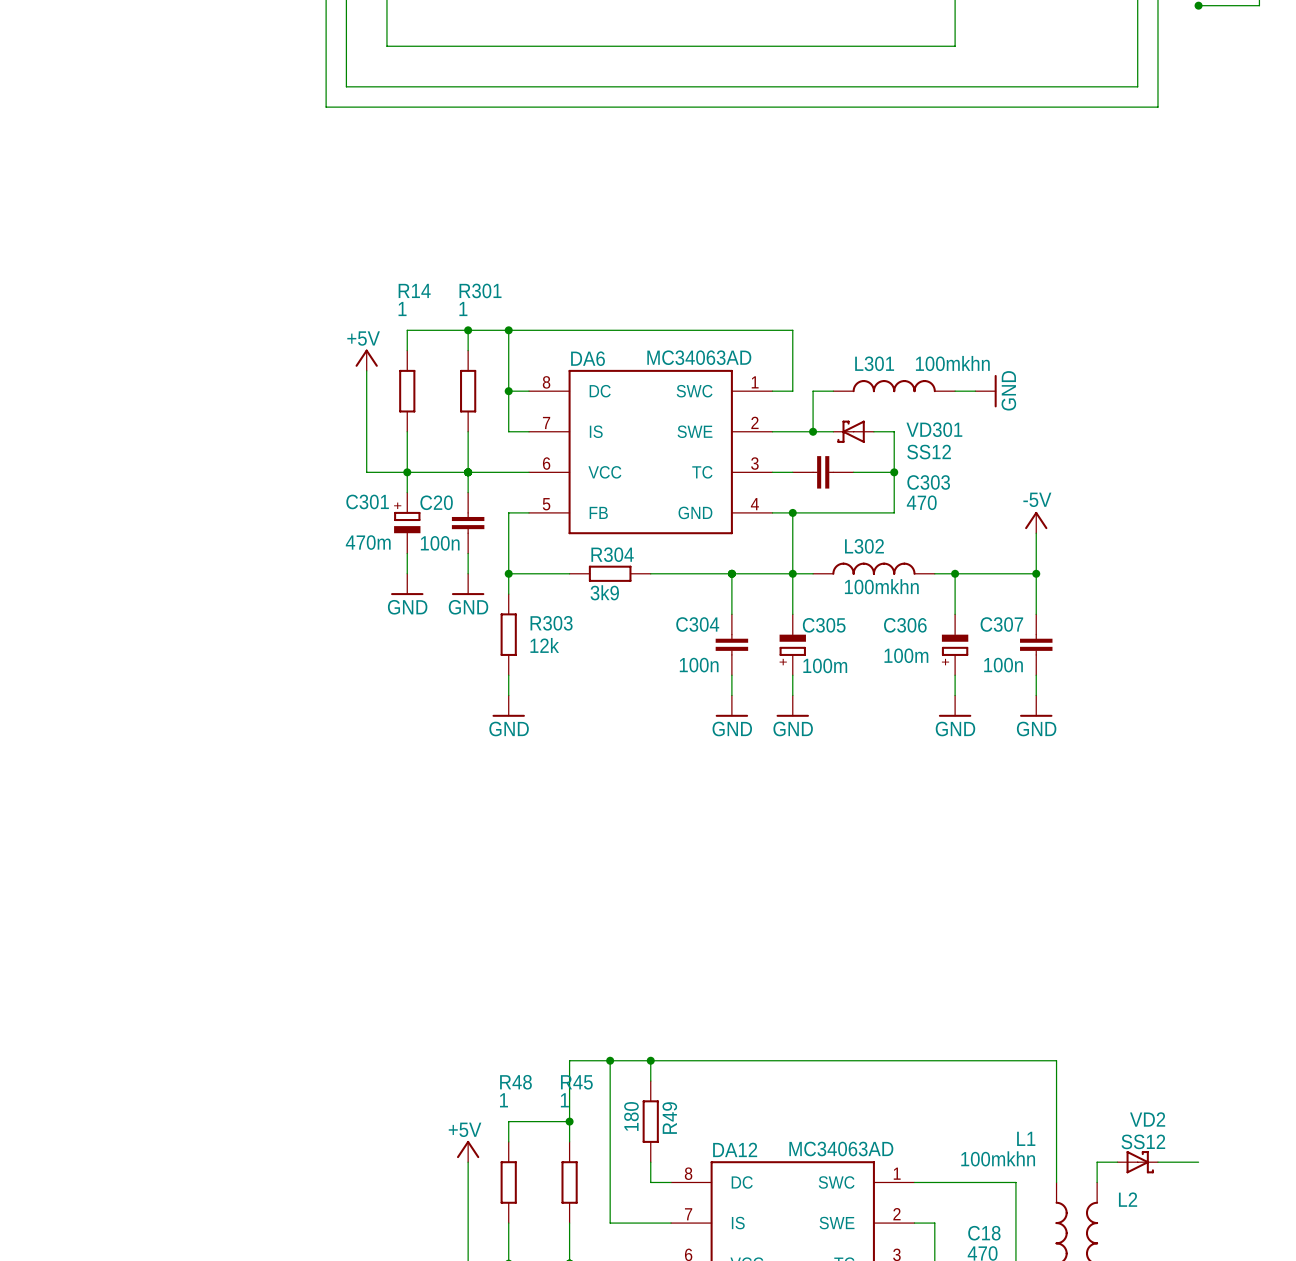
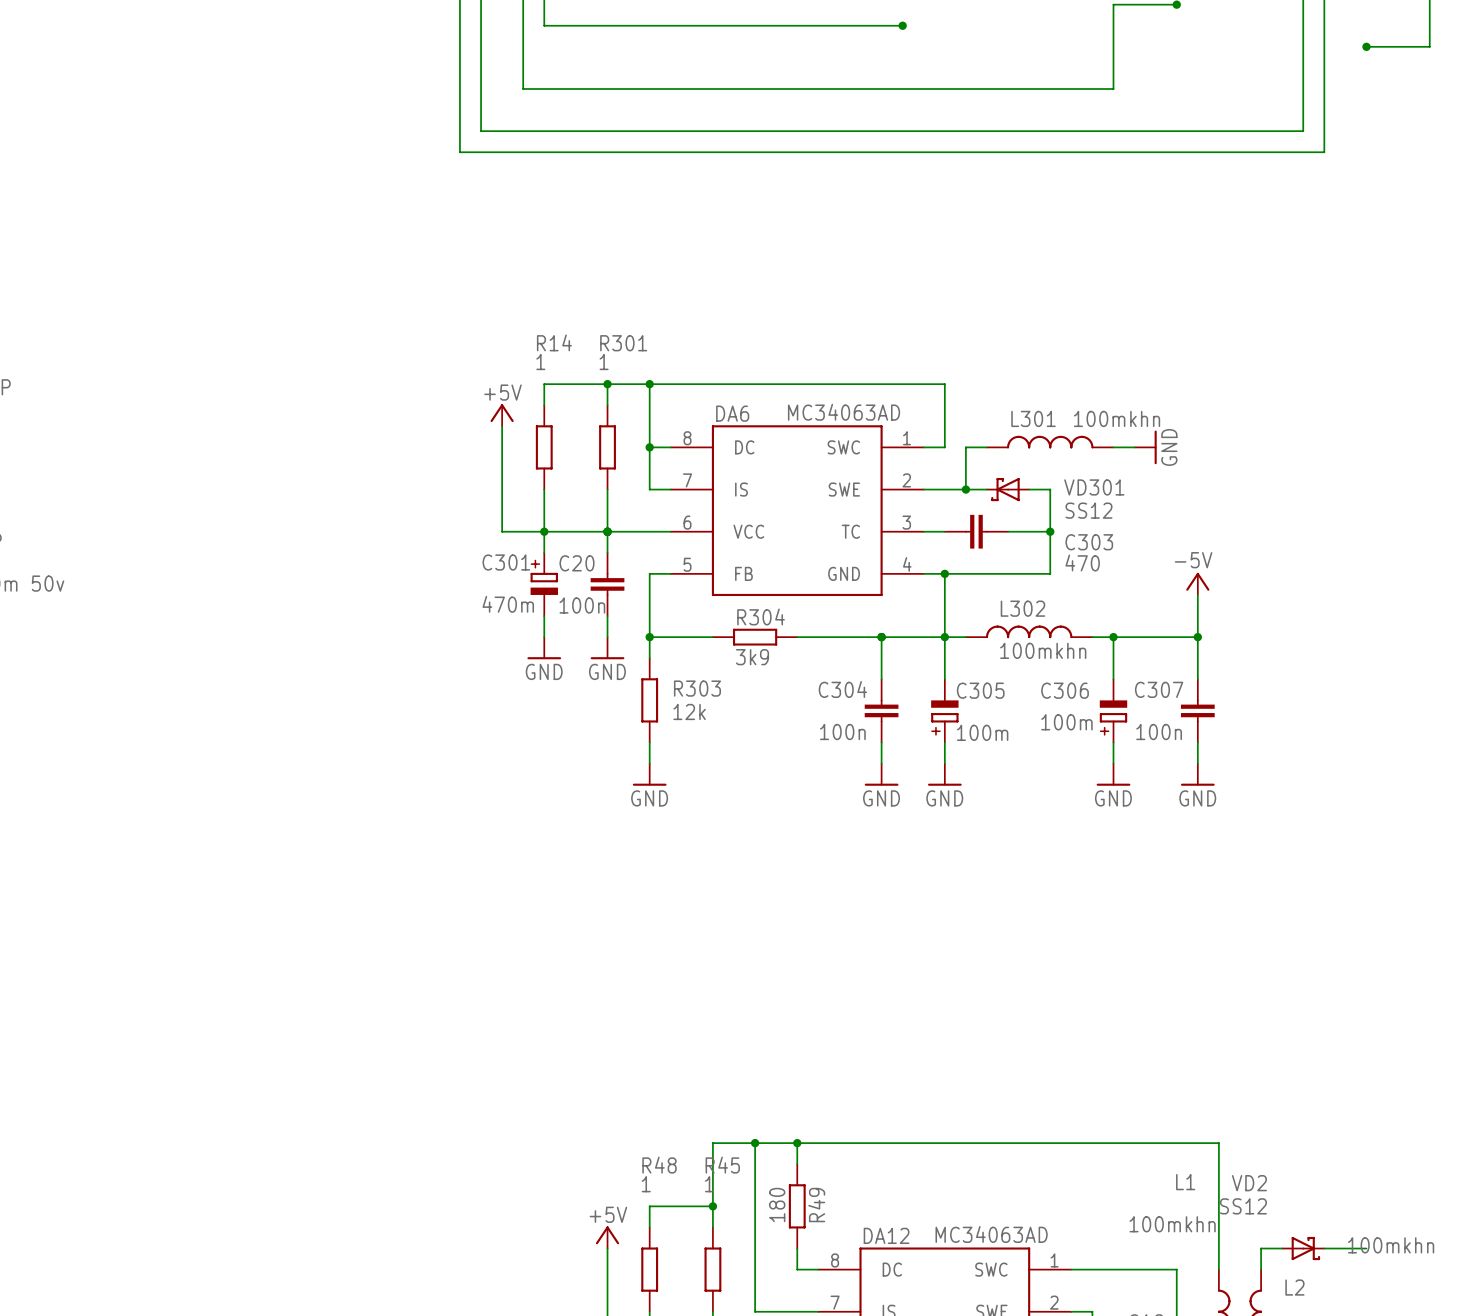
VD2 name position: VD2 (1147, 1119) -> VD2 (1249, 1183)
L1 name position: L1 (1026, 1138) -> L1 (1185, 1182)
VD2 value position: SS12 (1143, 1141) -> SS12 (1243, 1206)
L1 value position: 100mkhn (998, 1158) -> 100mkhn (1172, 1224)
L2 value: none -> 100mkhn (1391, 1245)

